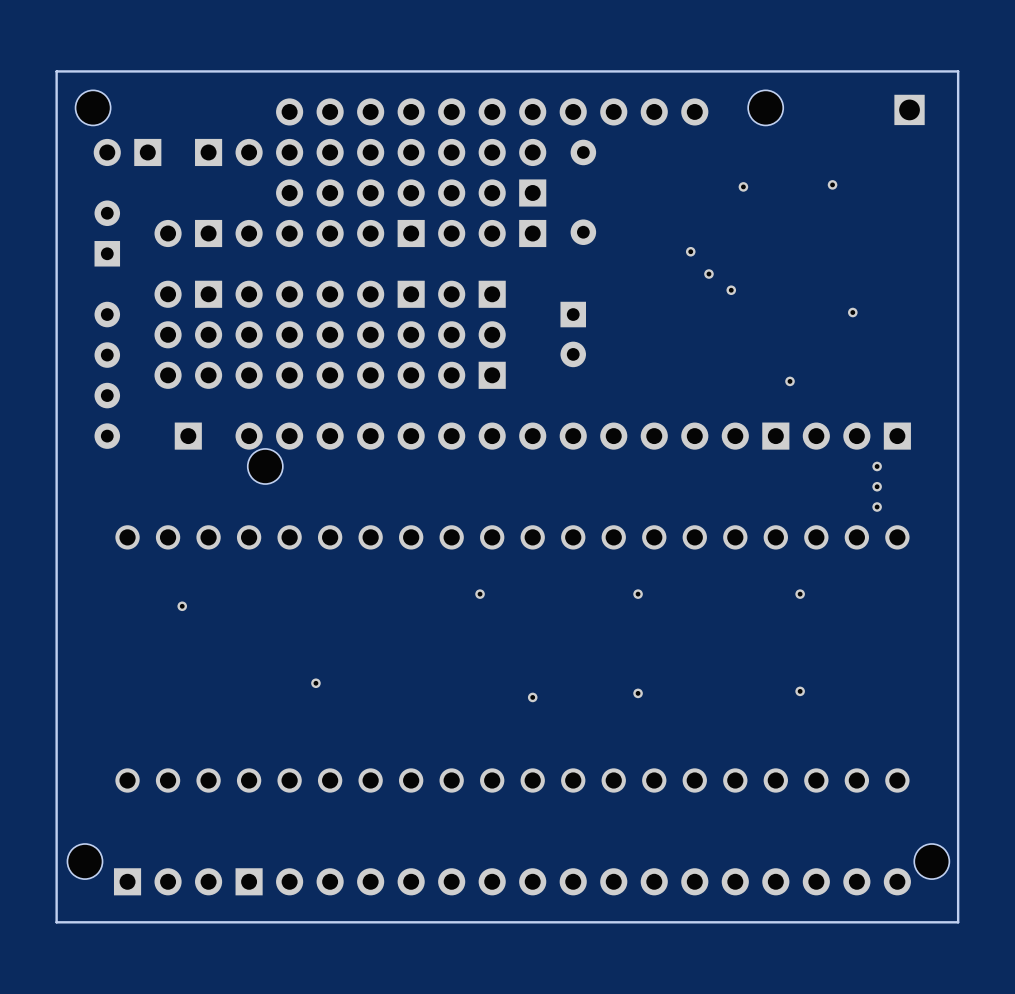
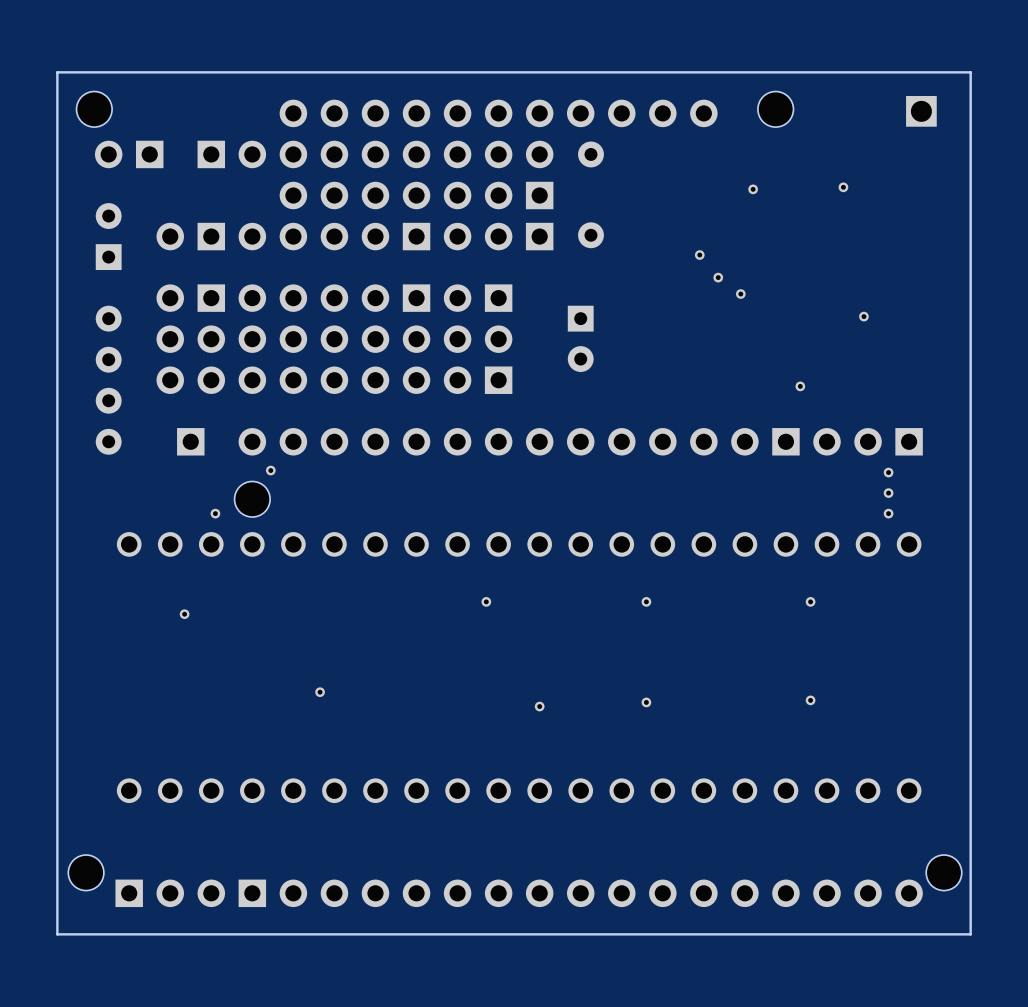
part footprint: [247, 448, 283, 485] -> [265, 465, 276, 476]
part: none -> (252, 499)
part: none -> (215, 513)

